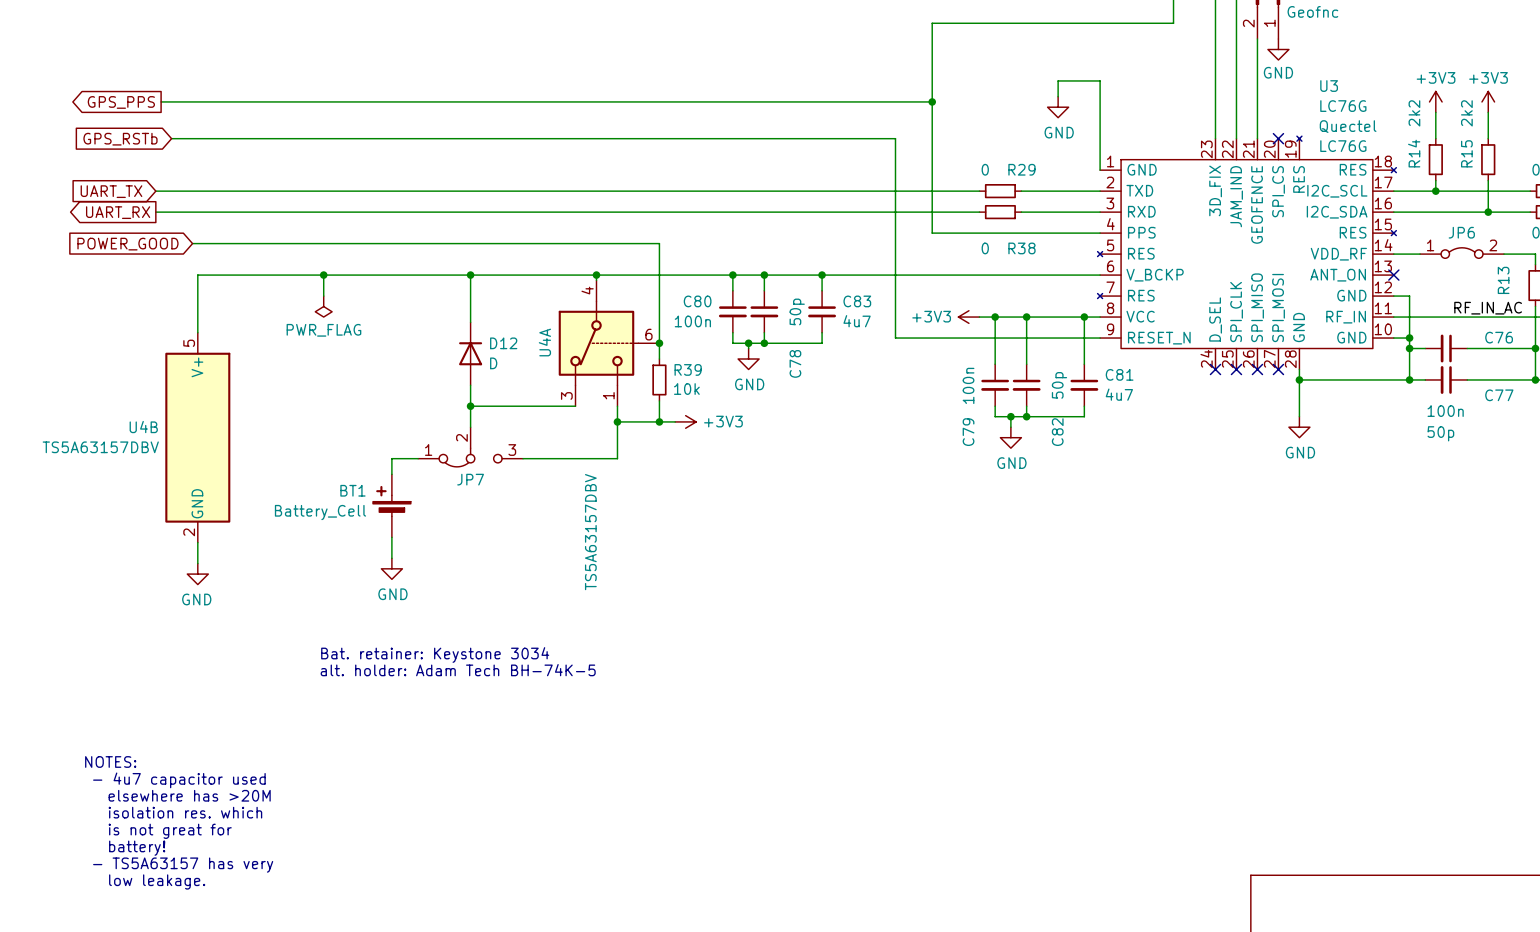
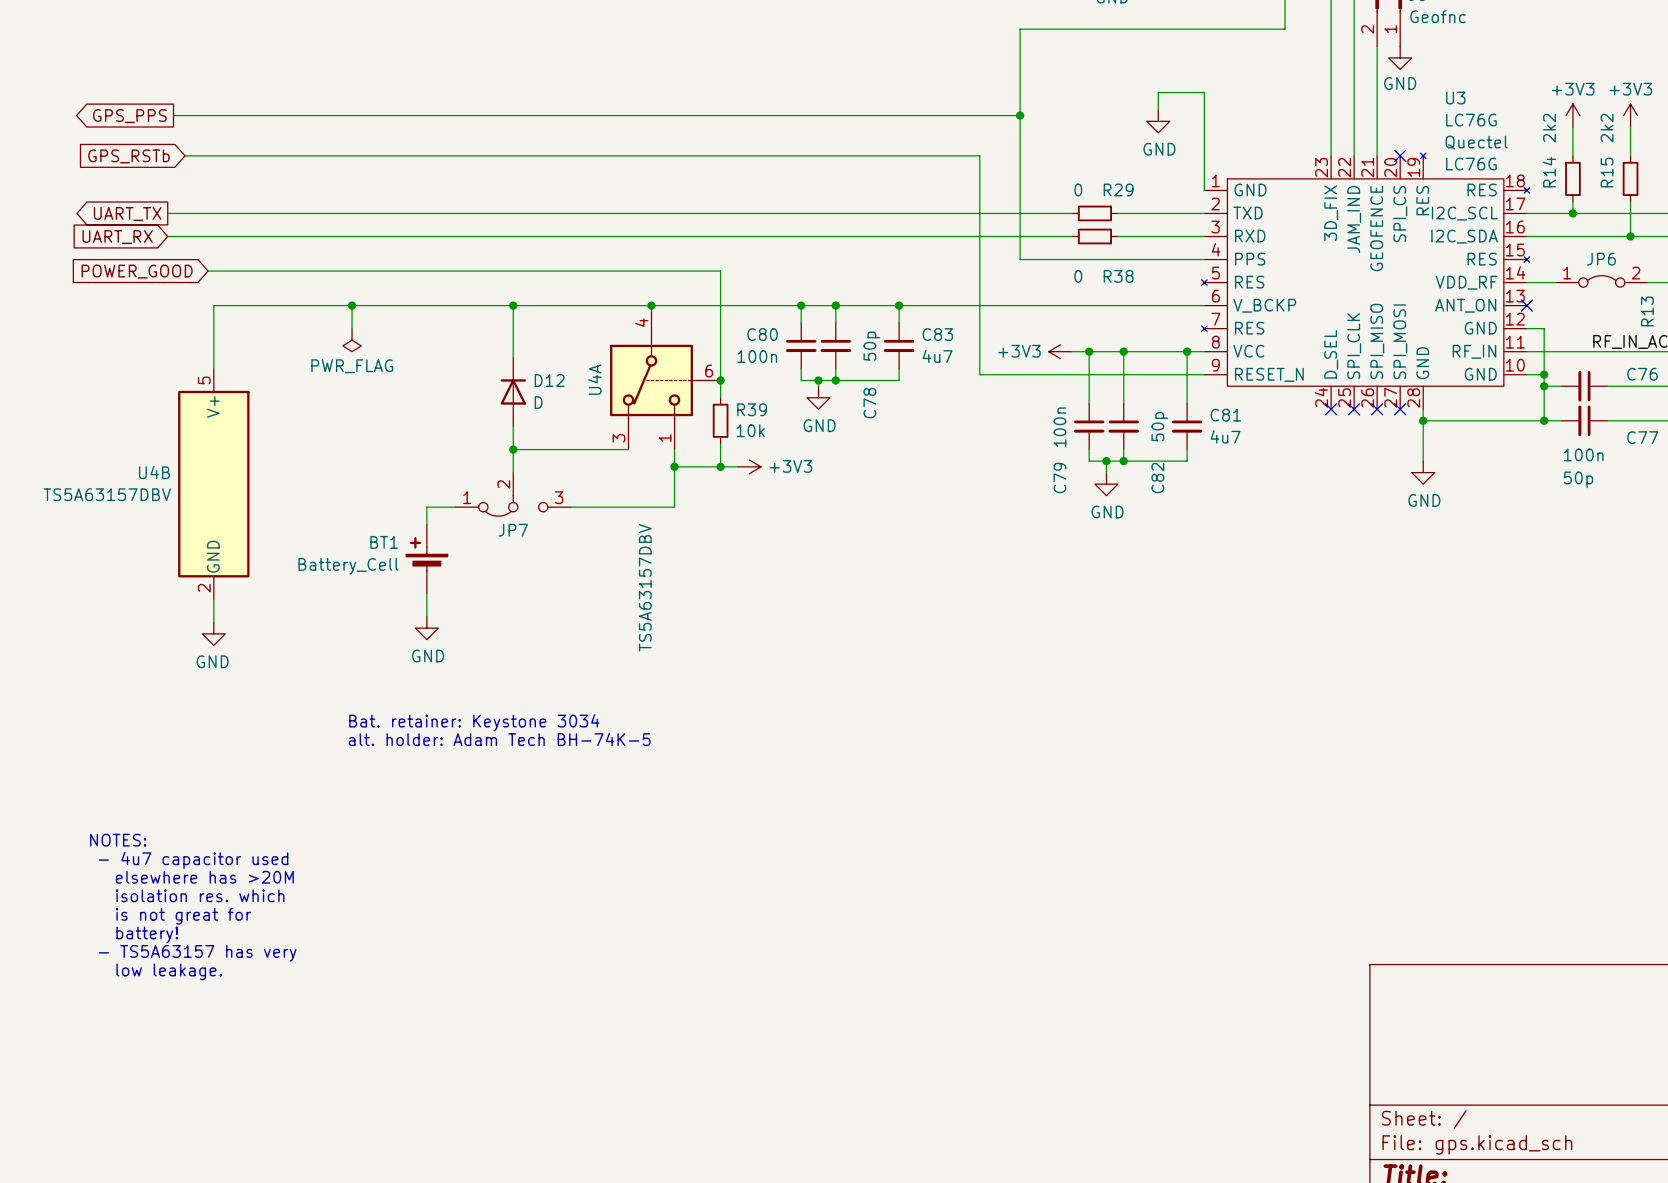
global label shape: input (111, 191) -> output (127, 214)
global label shape: output (118, 212) -> input (117, 237)

